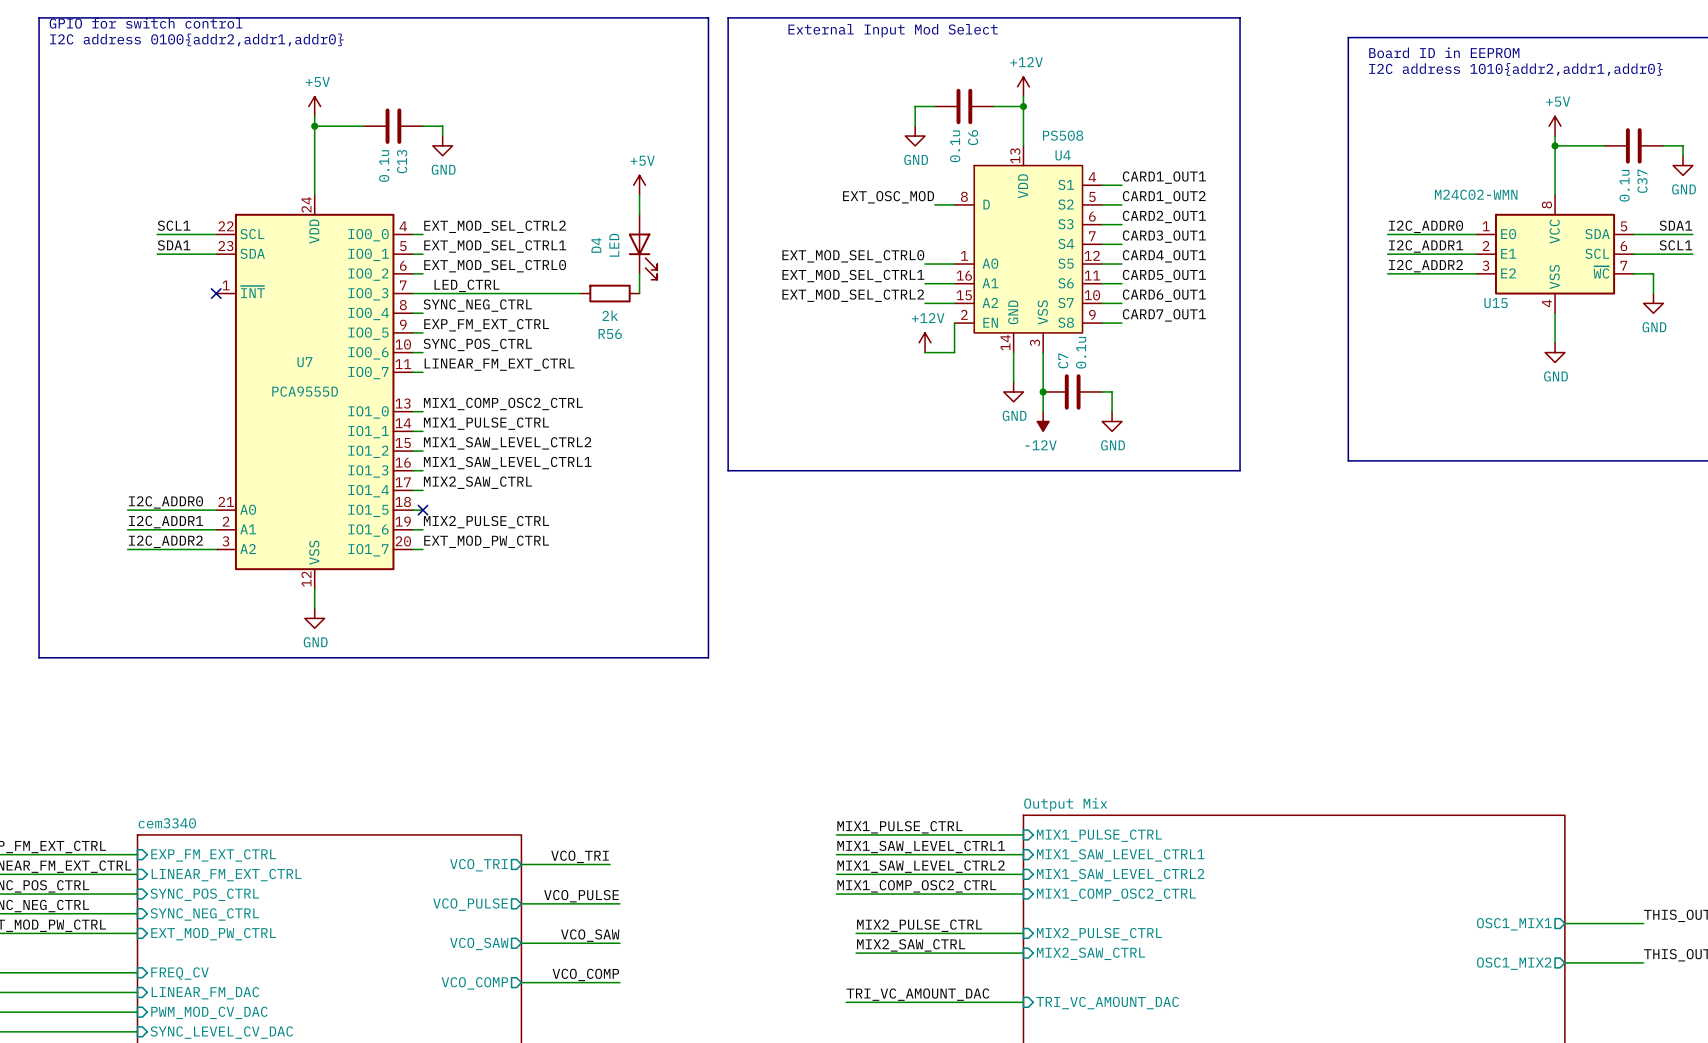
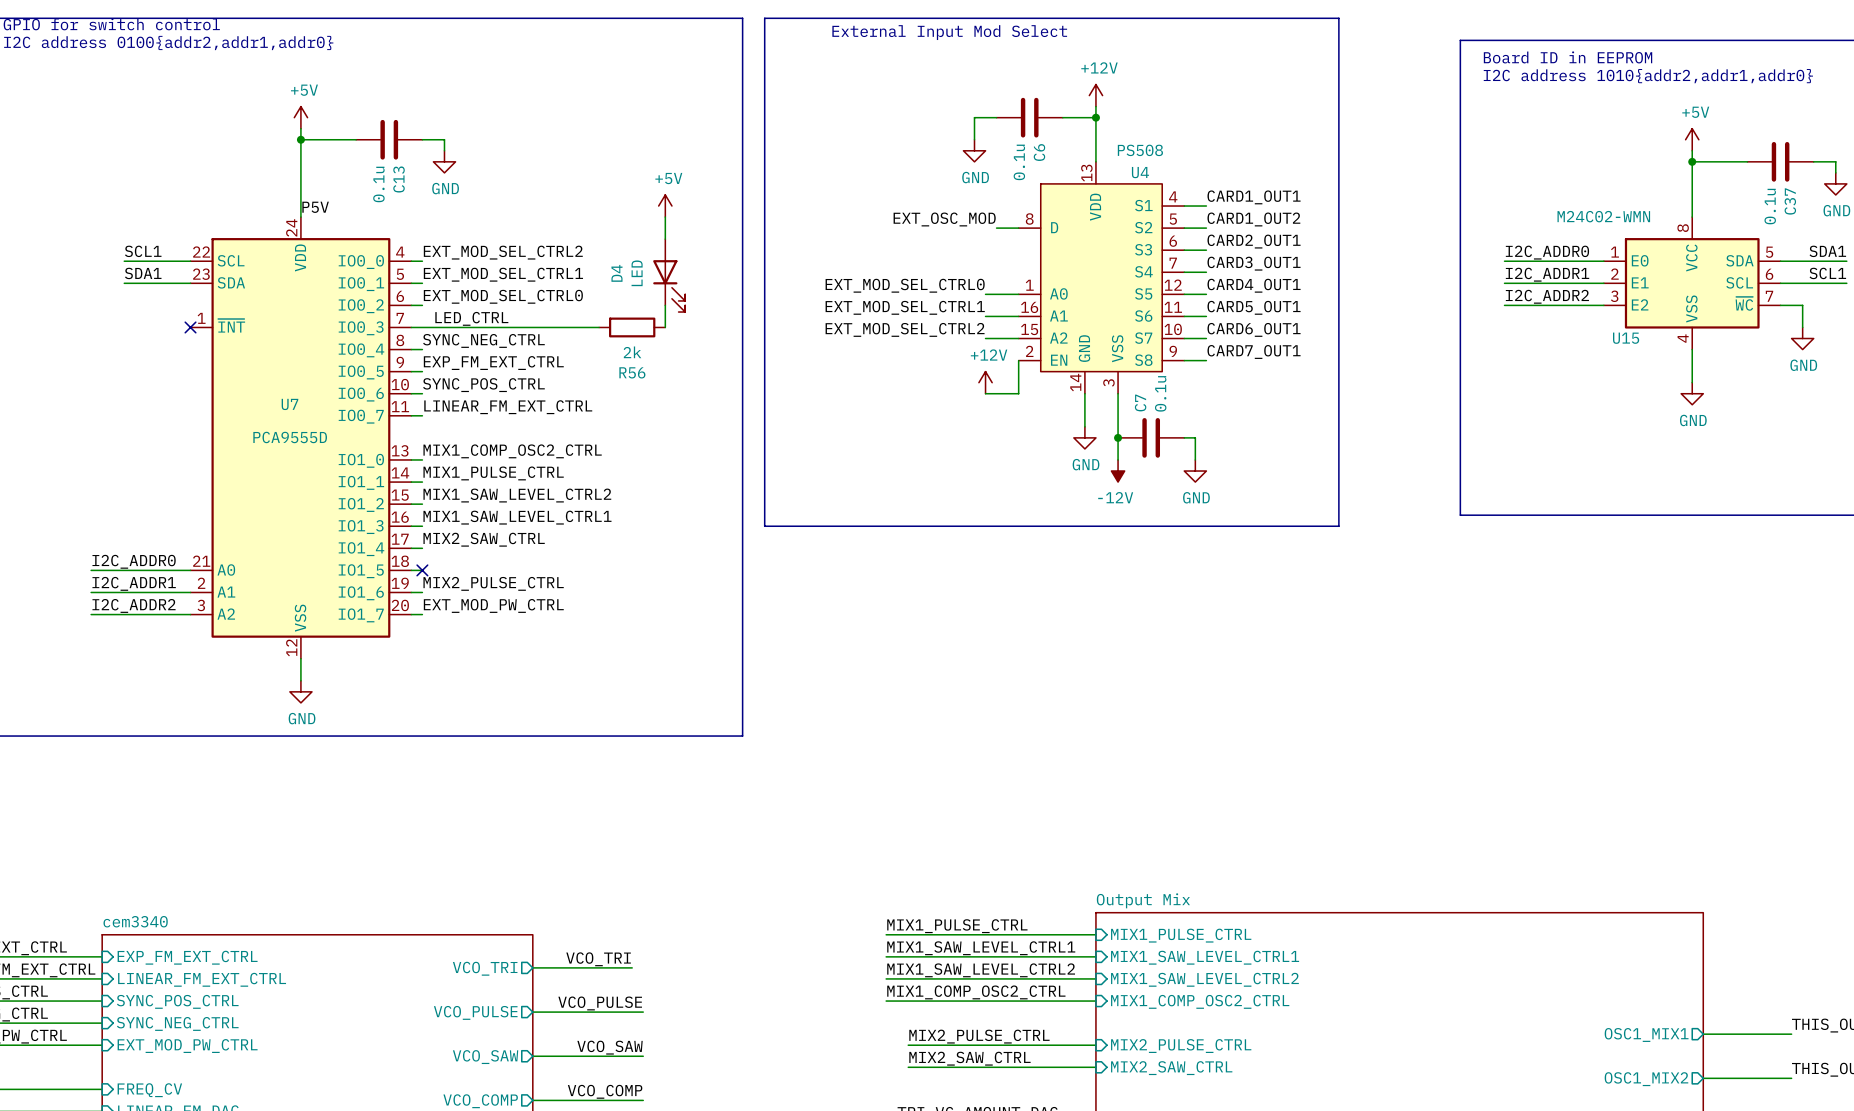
label: none -> P5V (315, 207)

